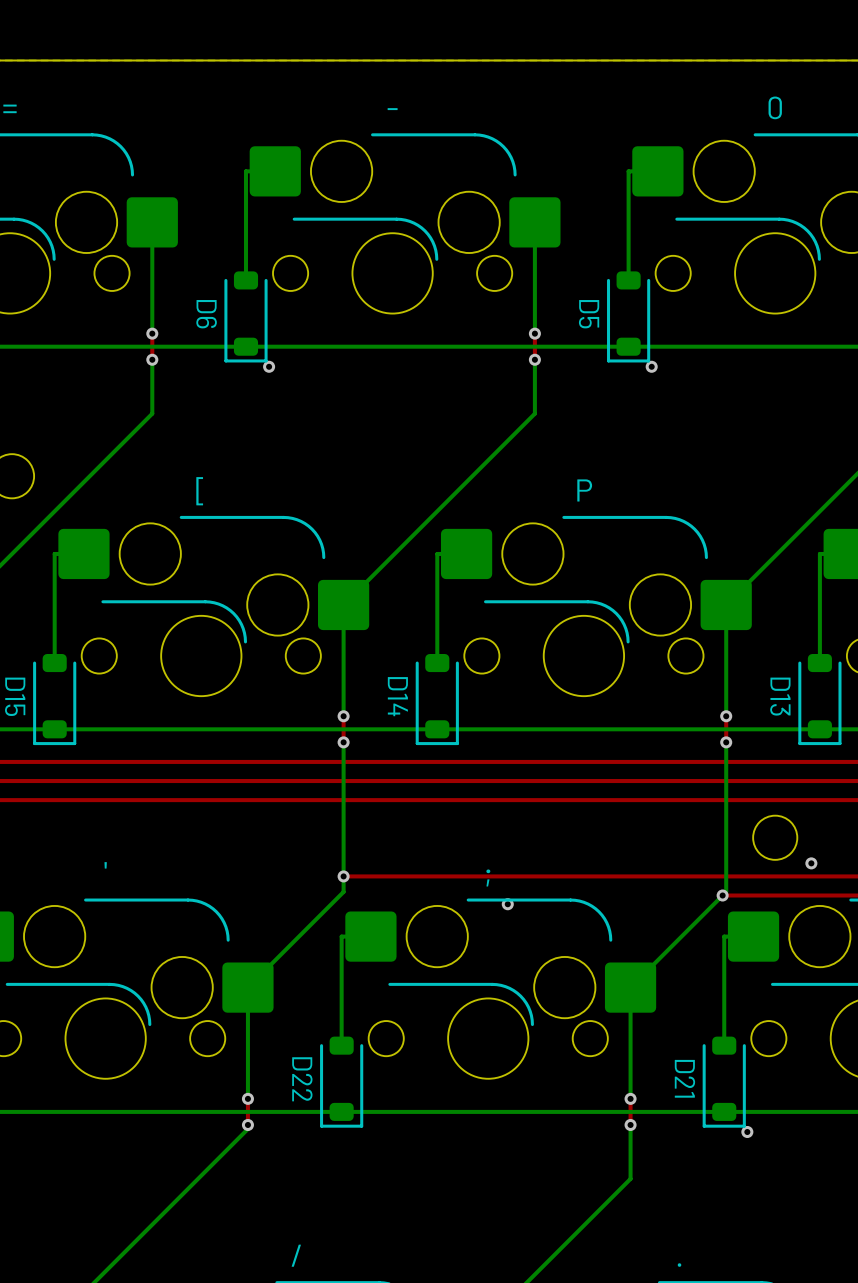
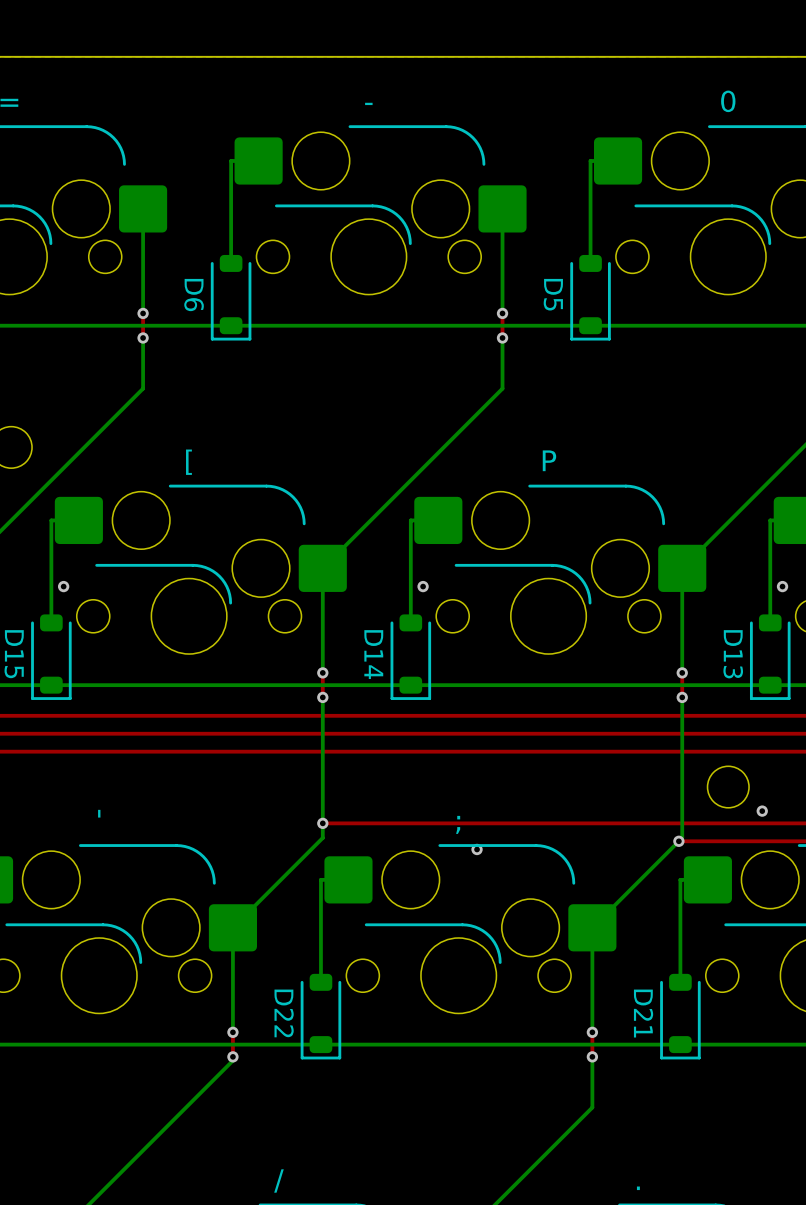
via: (269, 366) -> none
via: (651, 366) -> none
via: none -> (63, 586)
via: none -> (423, 586)
via: none -> (782, 586)
via: (747, 1132) -> none

